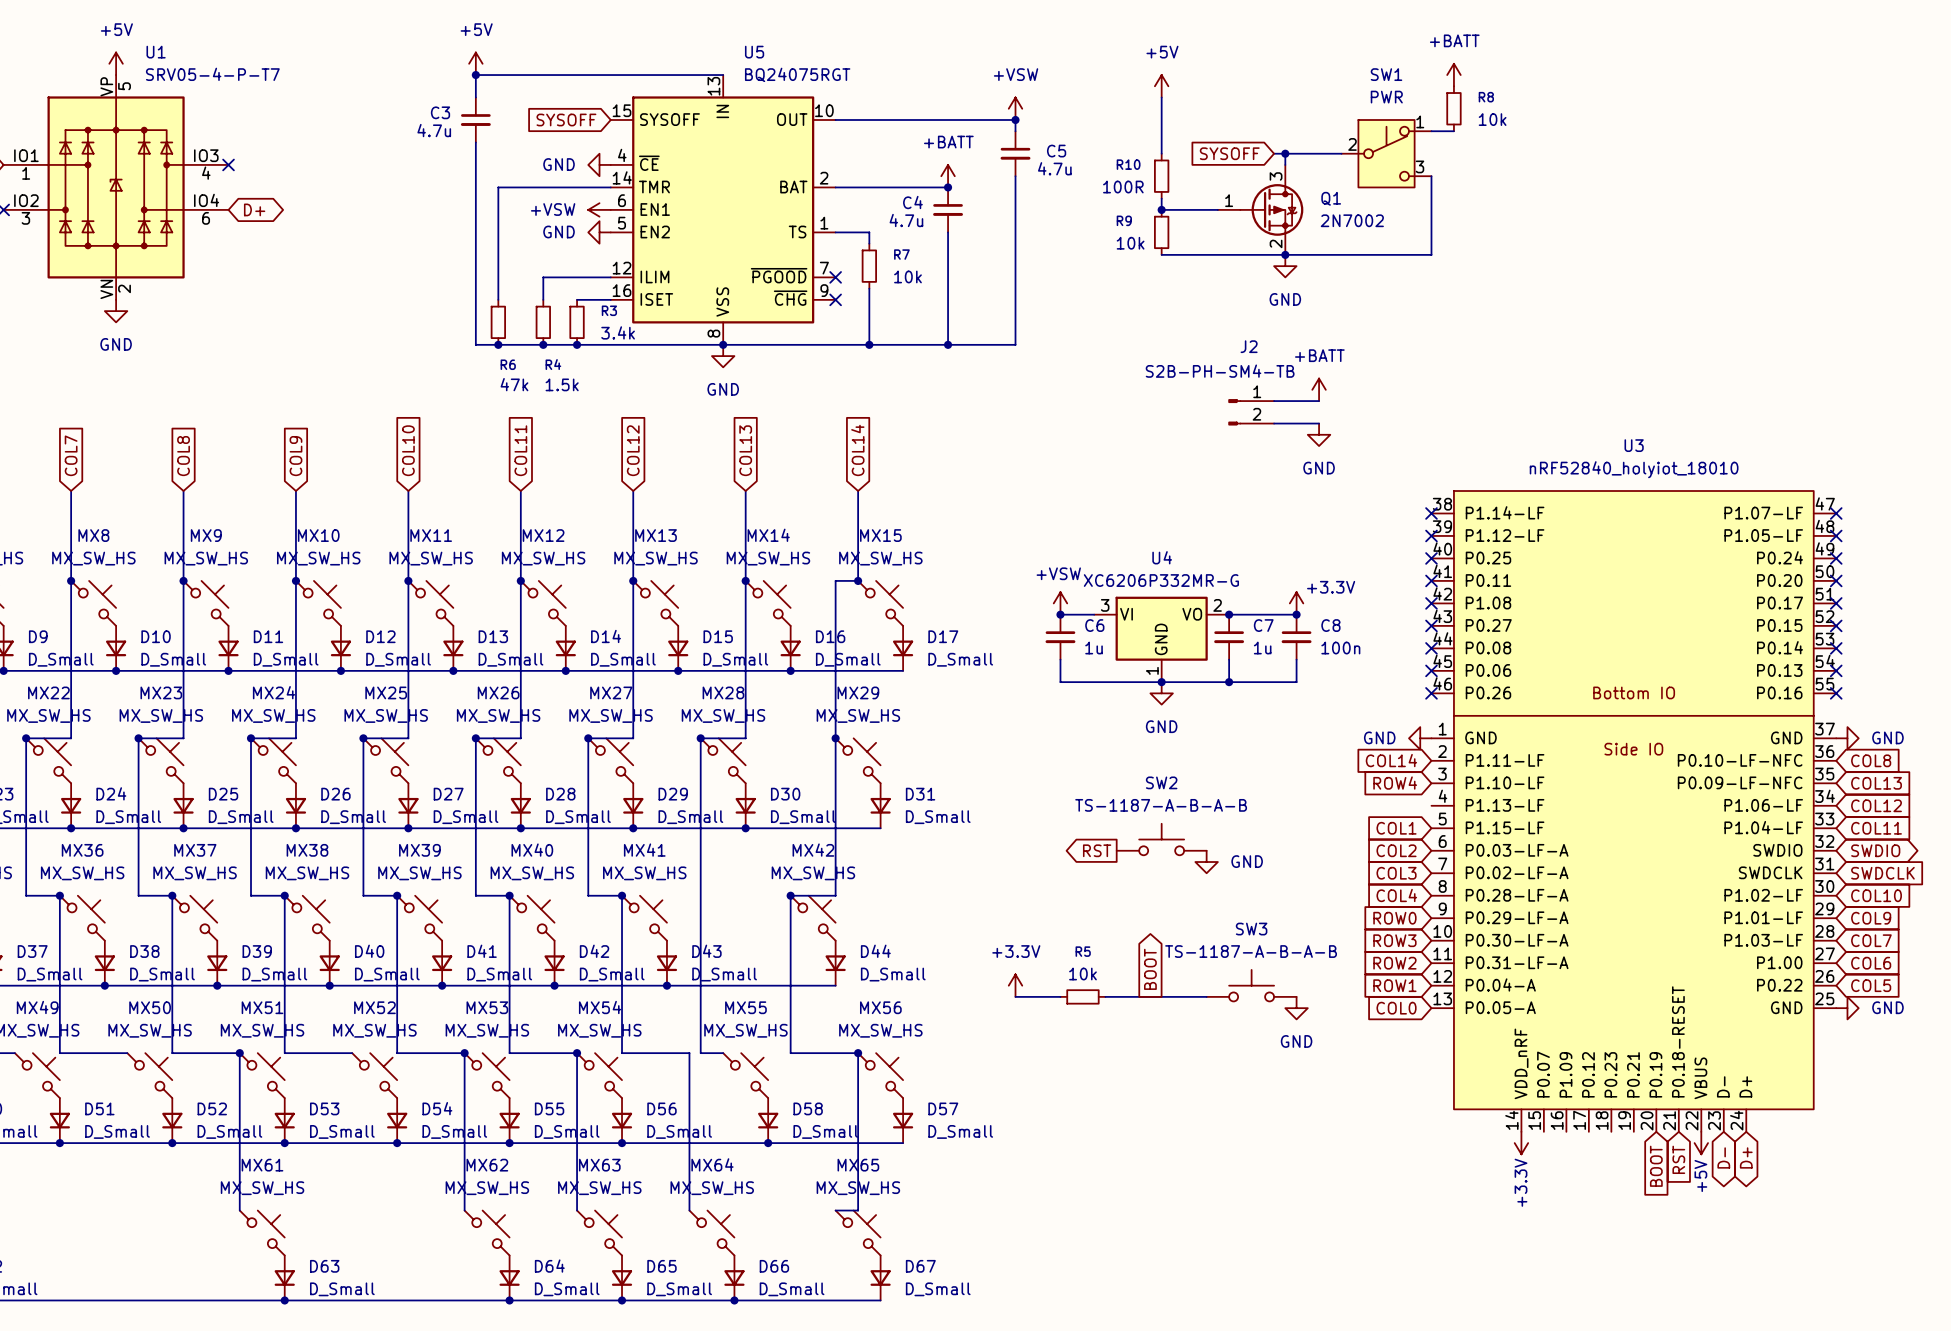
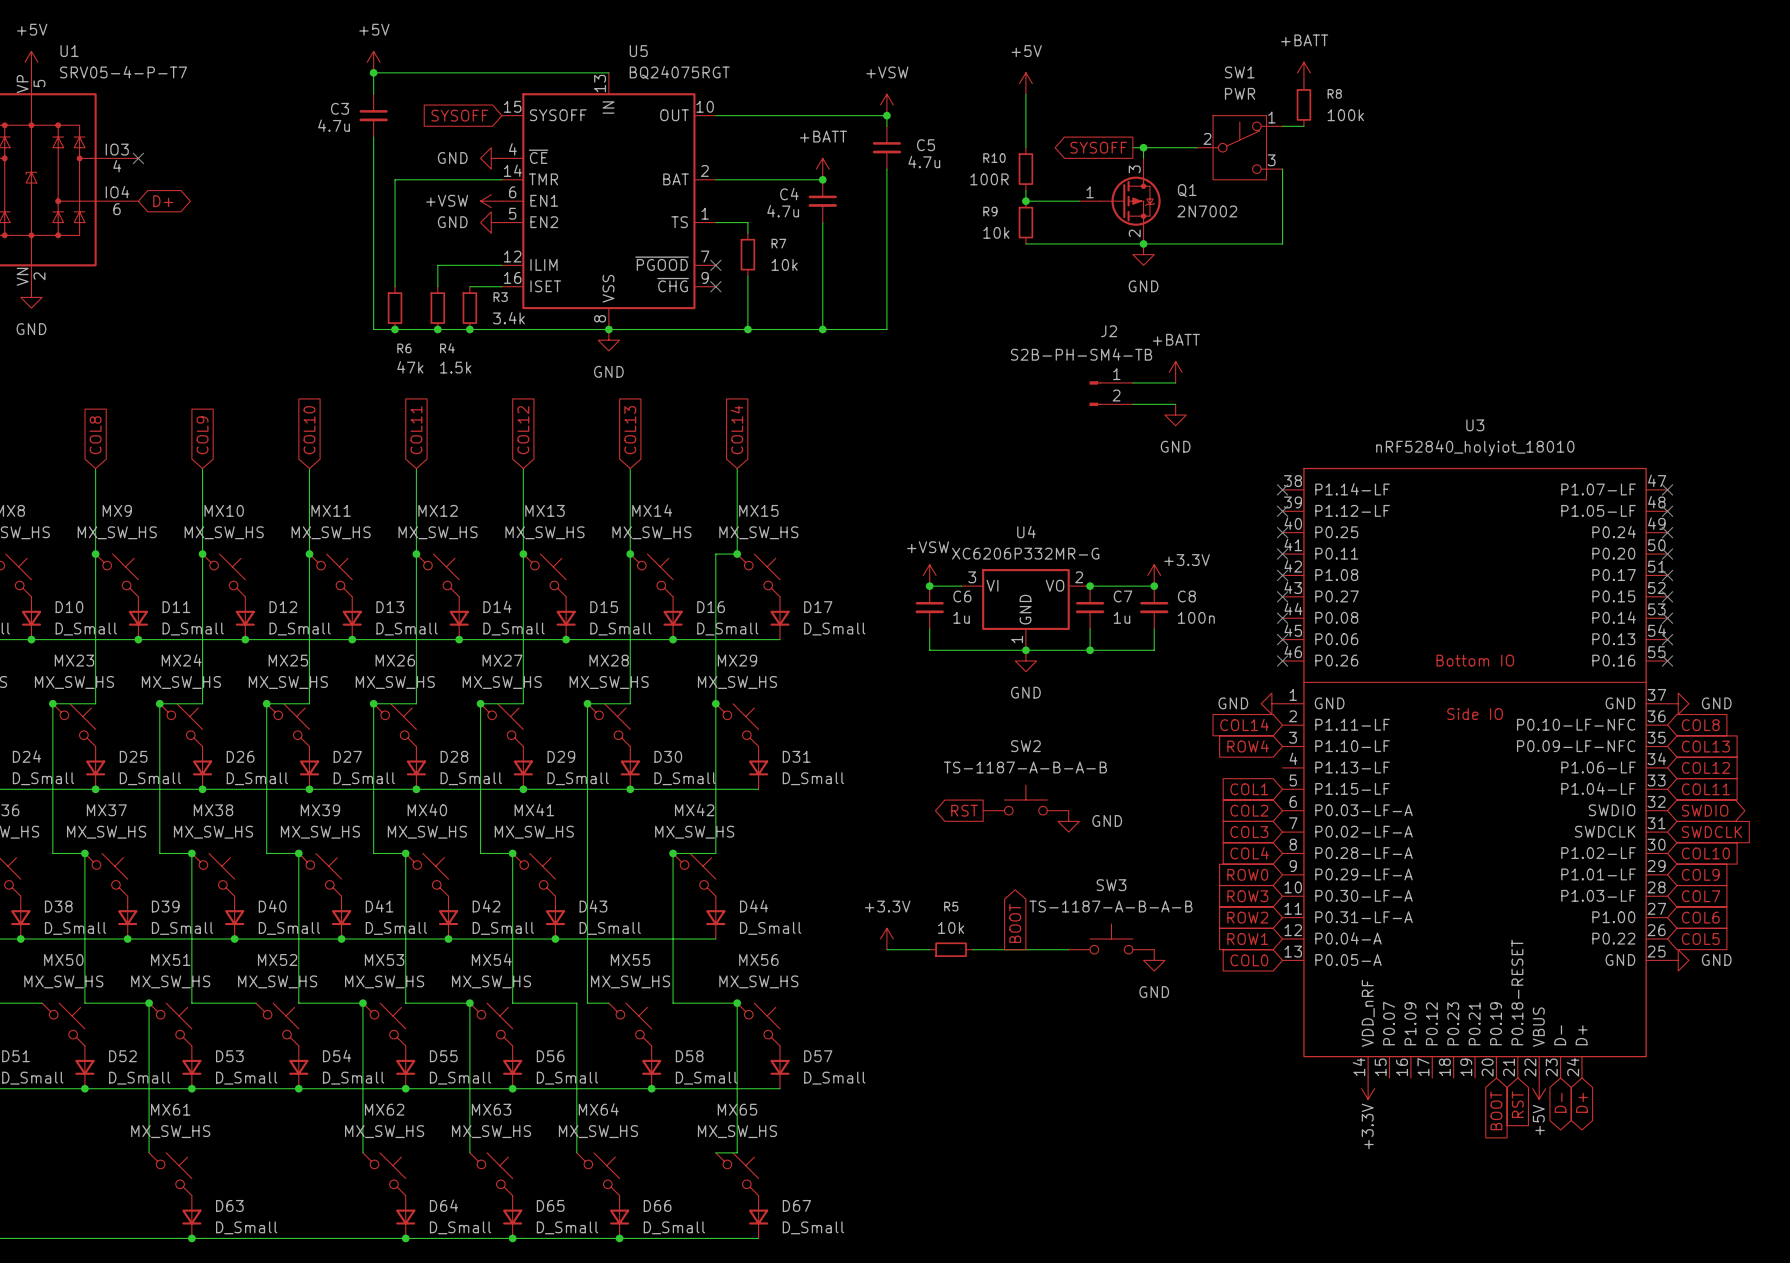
R8 value: 10k (1492, 119) -> 100k (1345, 115)
global label shape: input (1229, 153) -> output (1098, 147)

